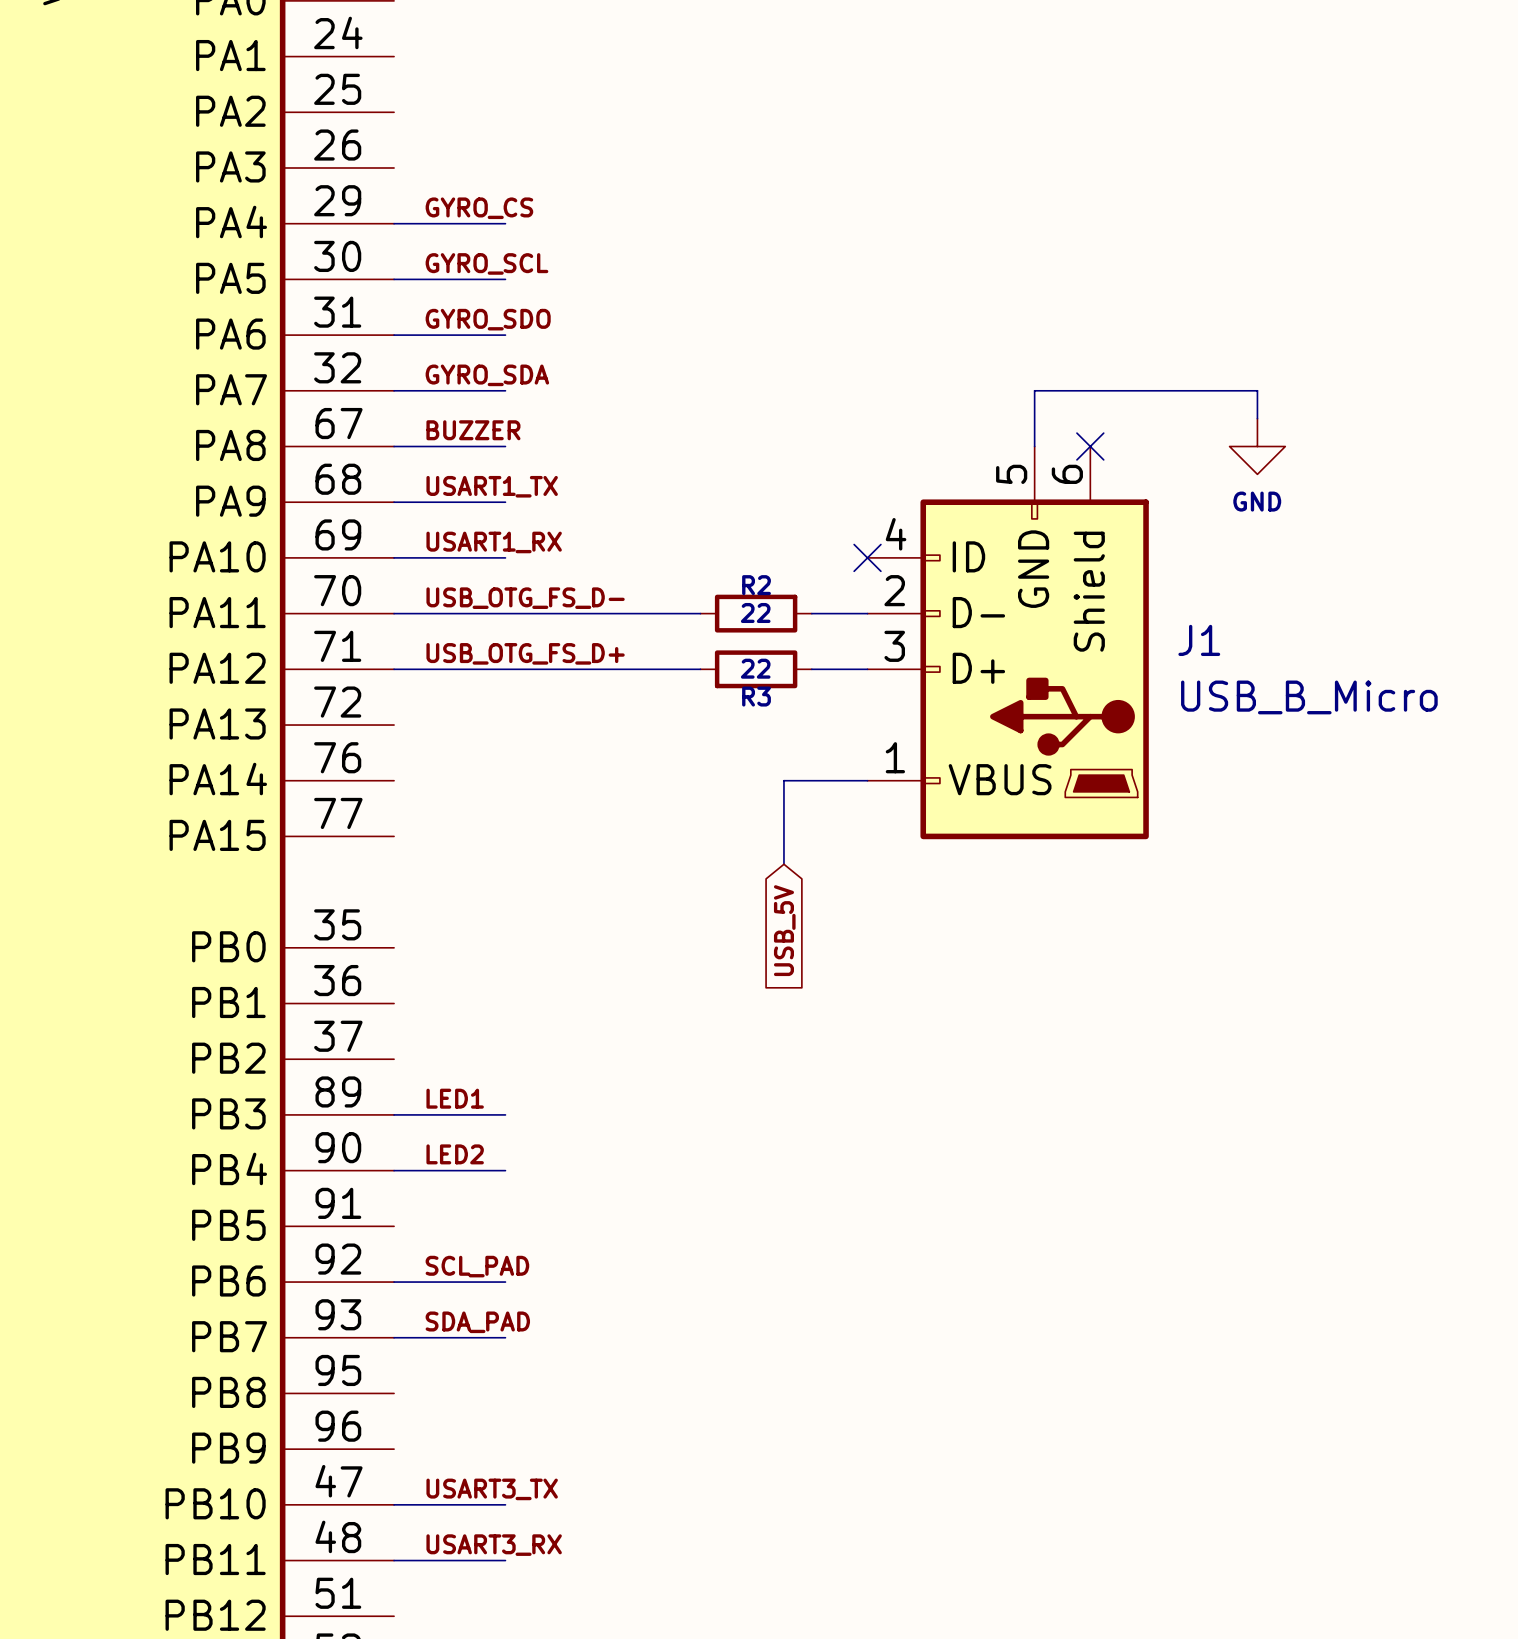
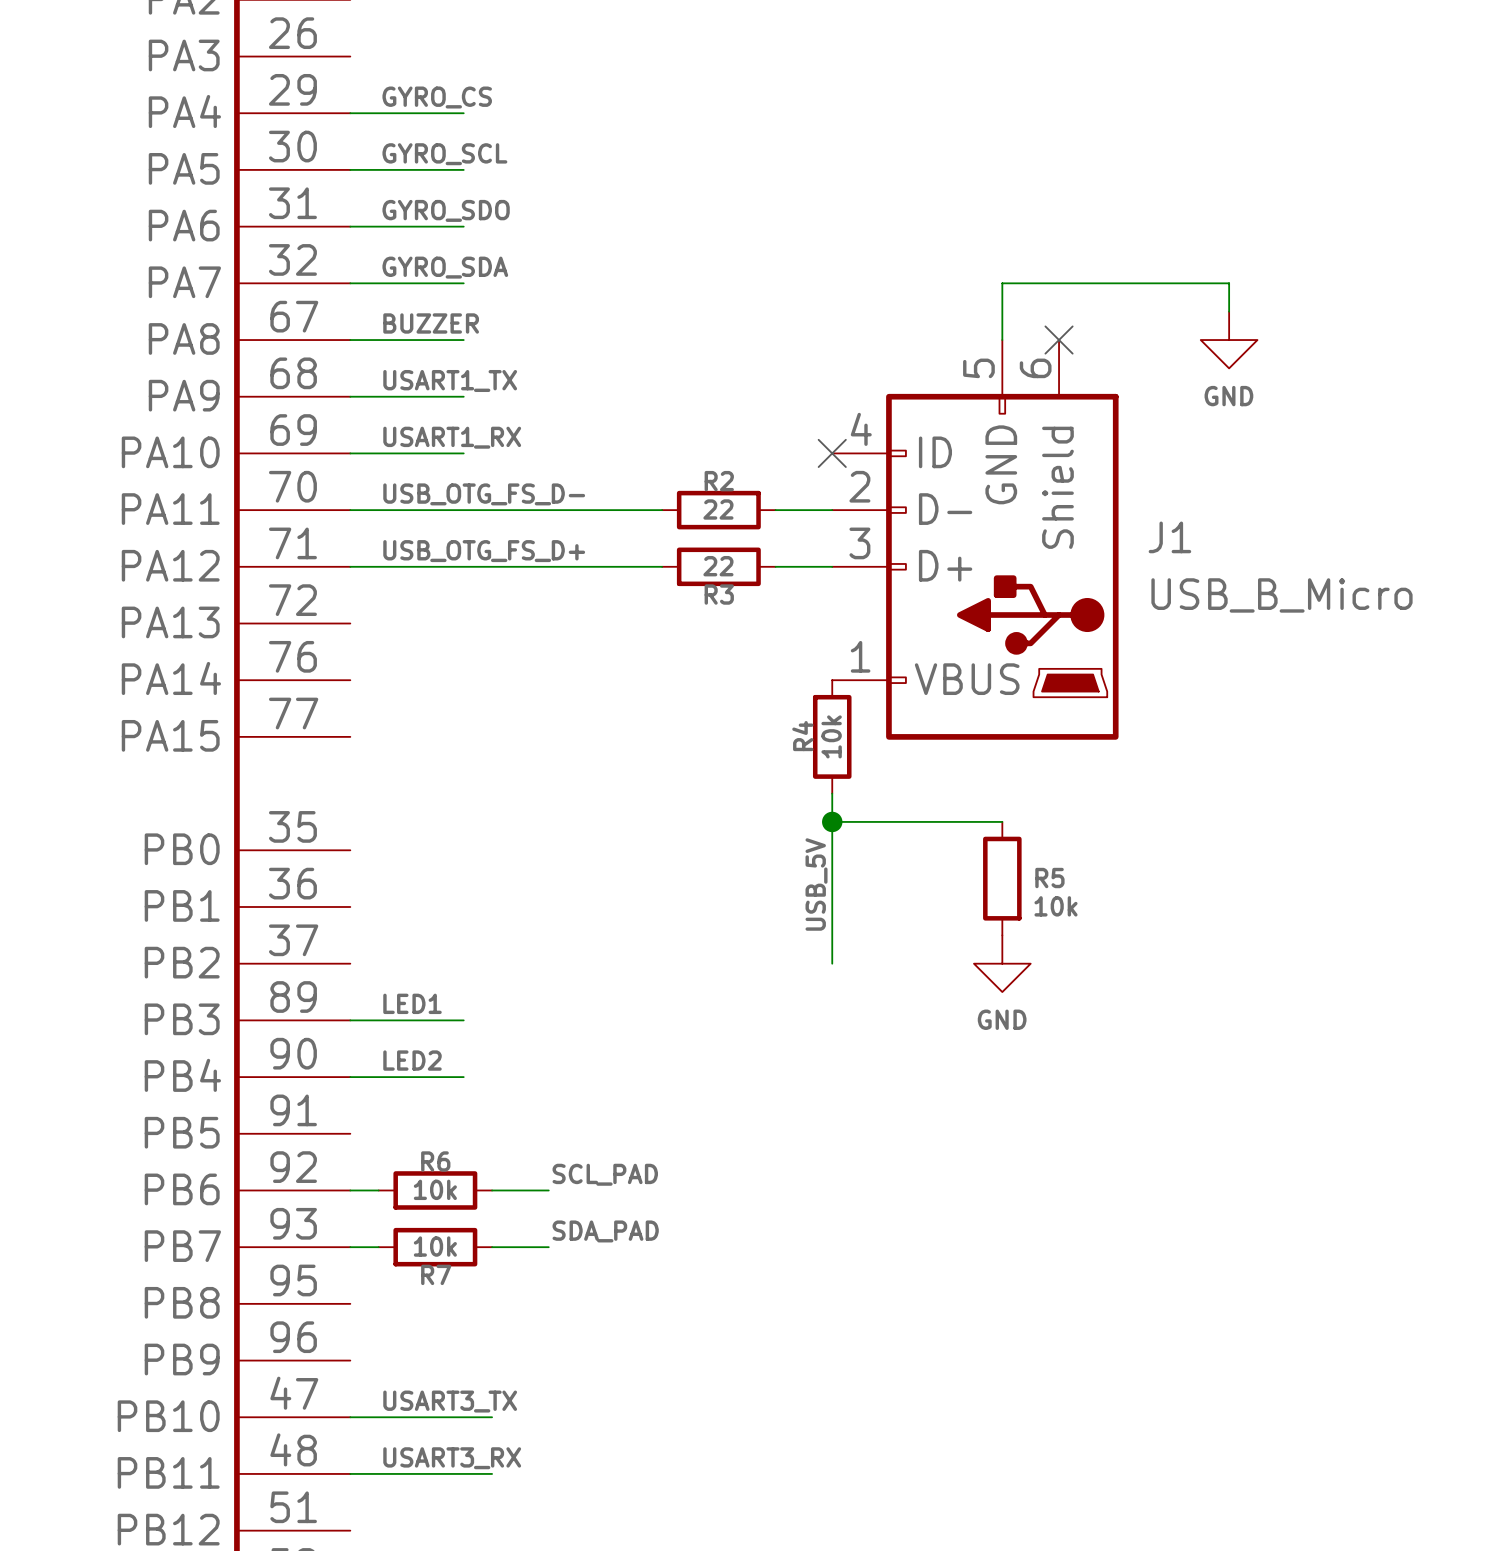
wire: (867, 780) (783, 780) (783, 864) -> none
R4: none -> 10k (832, 736)
wire: none -> (832, 793) (832, 963)
wire: none -> (832, 821) (1002, 821)
junction: none -> (832, 821)
global label: USB_5V (784, 930) -> none
R5: none -> 10k (1002, 878)
label: none -> USB_5V (816, 884)
power symbol: none -> GND (1002, 963)
label position: SCL_PAD (477, 1266) -> SCL_PAD (605, 1174)
wire: (421, 1282) (505, 1282) -> none
R6: none -> 10k (435, 1190)
wire: none -> (492, 1190) (548, 1190)
label position: SDA_PAD (477, 1322) -> SDA_PAD (605, 1231)
wire: (421, 1337) (505, 1337) -> none
R7: none -> 10k (435, 1247)
wire: none -> (492, 1247) (548, 1247)
wire: none -> (463, 1417) (492, 1417)
wire: none -> (463, 1473) (492, 1473)

